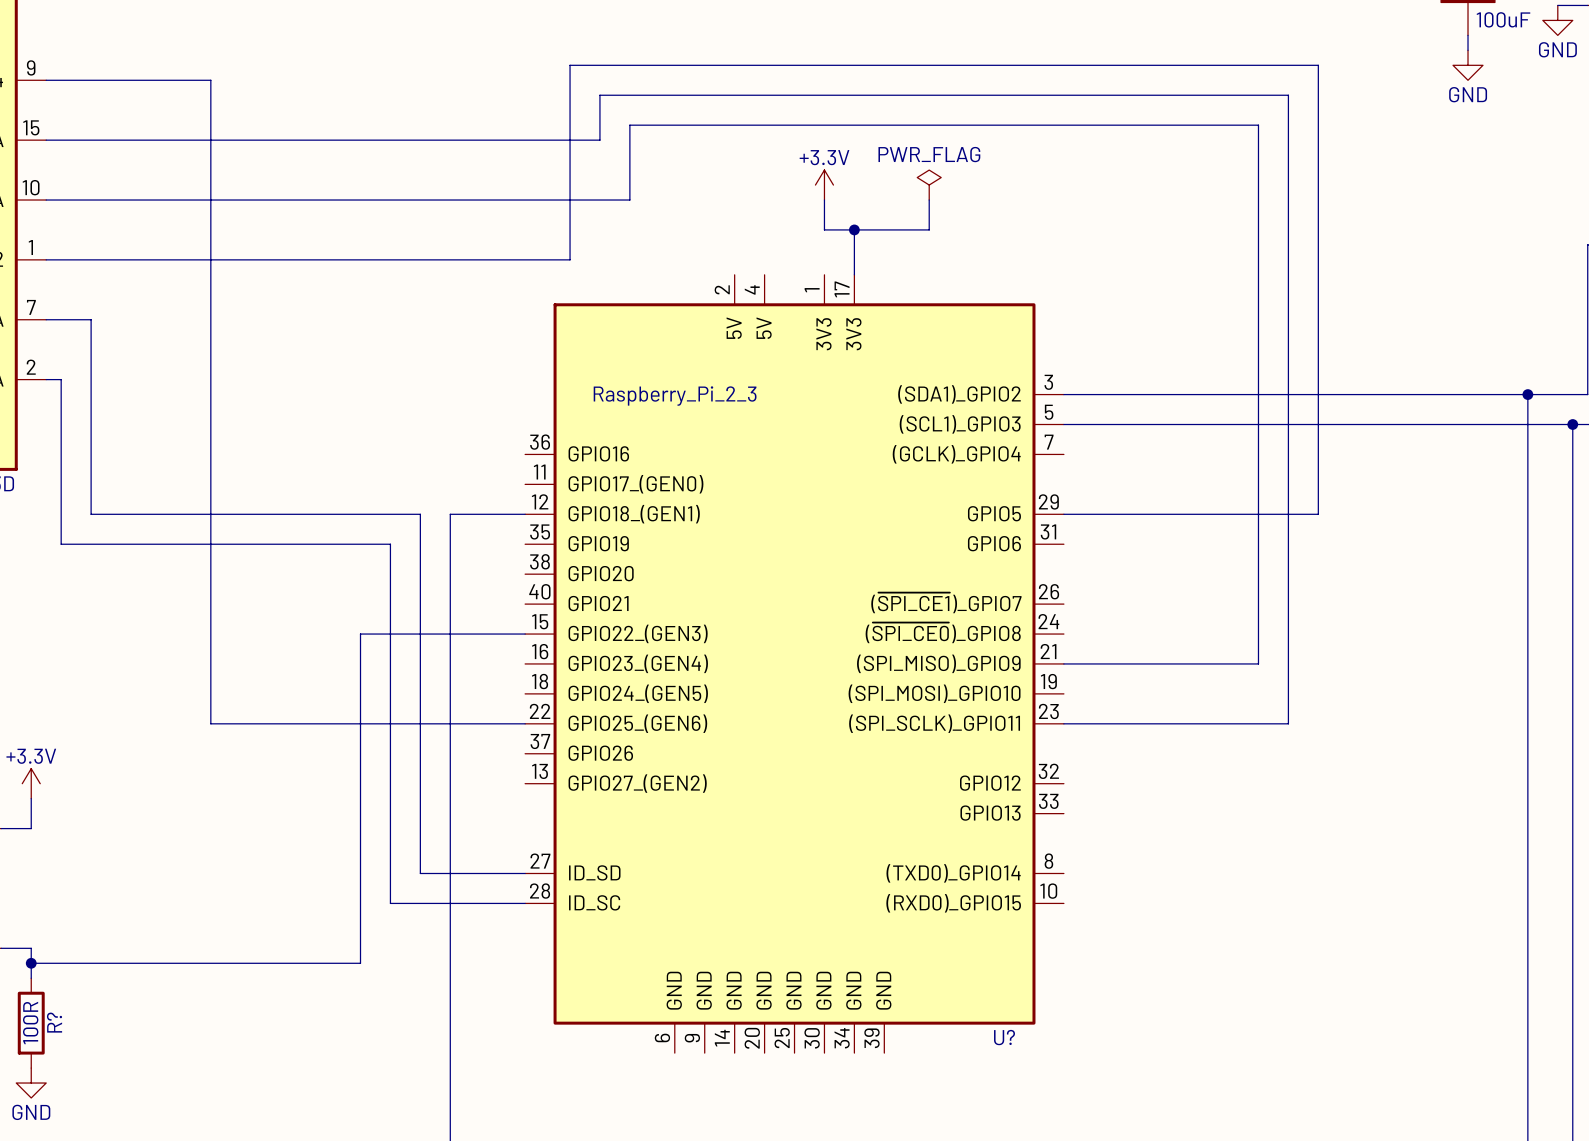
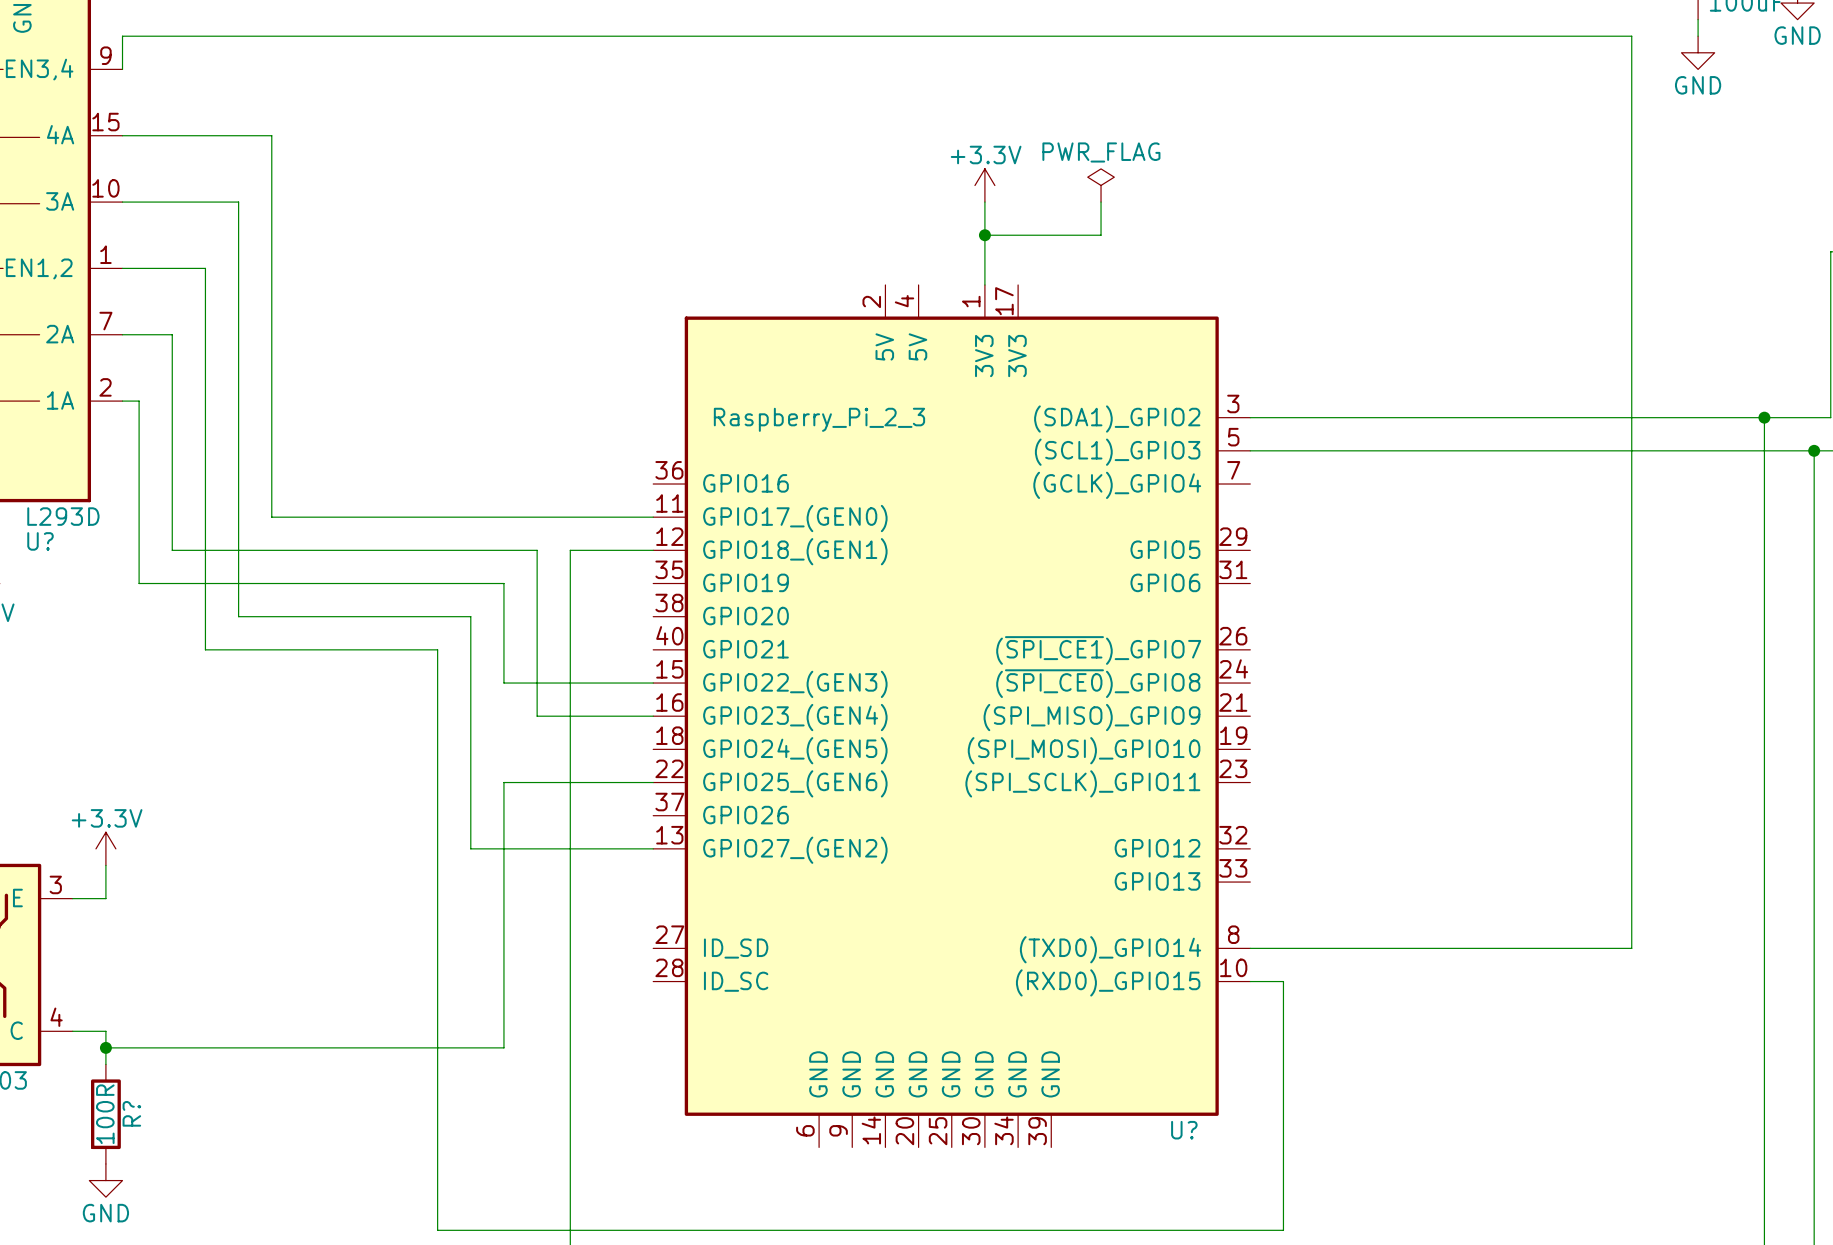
wire: (46, 80) (210, 80) (210, 723) (390, 723) (390, 634) (360, 634) -> (238, 202) (238, 616) (470, 616) (470, 683)
wire: none -> (122, 69) (122, 36) (1631, 36) (1631, 948) (1250, 948)
wire: (180, 140) (599, 140) (599, 95) (1288, 95) (1288, 723) (1063, 723) -> (271, 135) (271, 517) (653, 517)
wire: (150, 200) (629, 200) (629, 125) (1258, 125) (1258, 663) (1063, 663) -> none
wire: (854, 229) (854, 274) -> (984, 235) (984, 284)
junction position: (854, 229) -> (984, 235)
wire: (121, 259) (570, 259) (570, 65) (1318, 65) (1318, 514) (1063, 514) -> (205, 268) (205, 649) (437, 649) (437, 1230) (1283, 1230) (1283, 981) (1250, 981)
wire: (420, 663) (420, 873) (525, 873) -> (537, 716) (653, 716)
wire: (360, 783) (360, 963) -> (503, 981) (503, 1047) (470, 1047)
wire: none -> (470, 848) (653, 848)
wire: (390, 903) (525, 903) -> none

